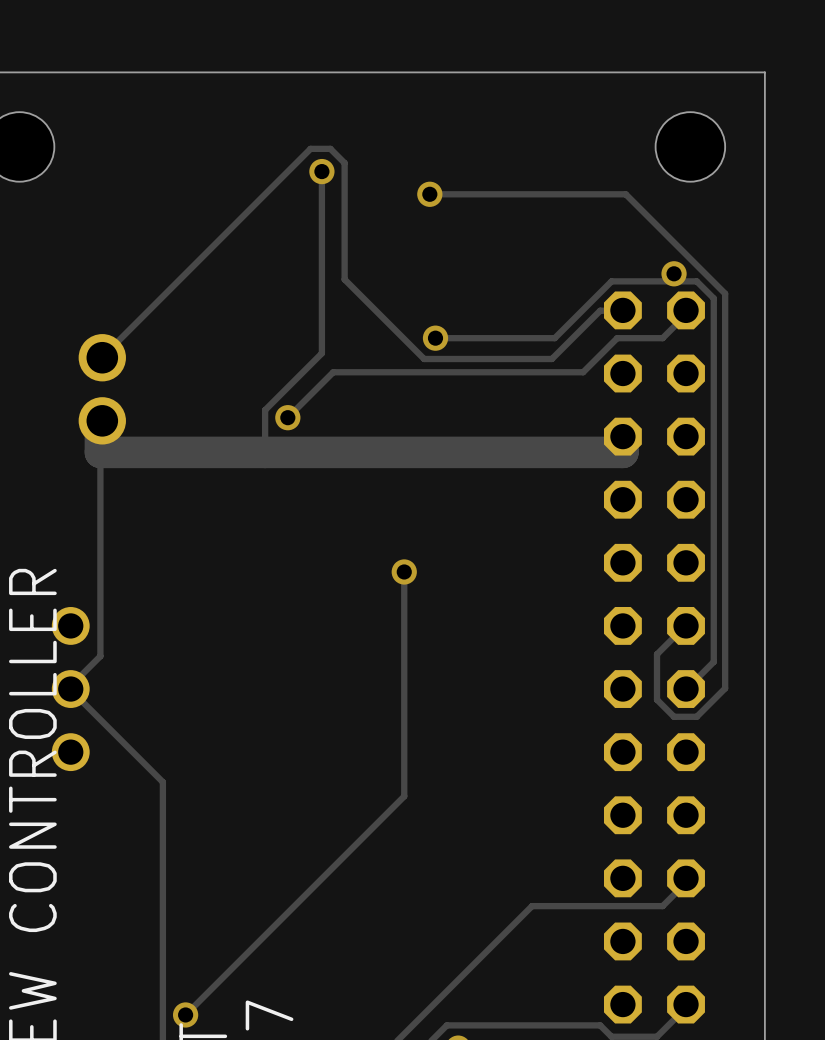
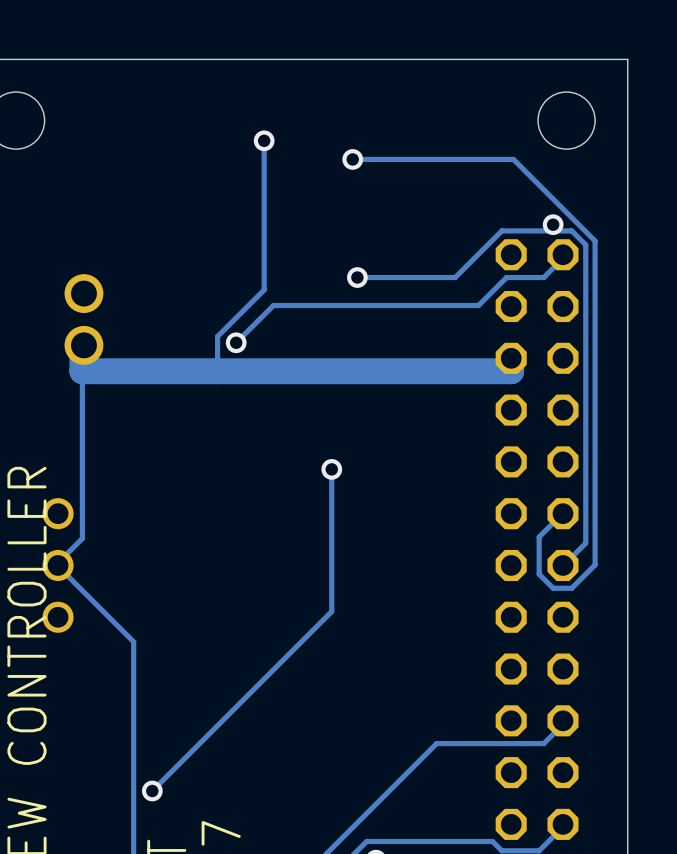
track: (622, 310) (600, 310) (551, 358) (424, 358) (344, 279) (344, 163) (330, 148) (310, 148) (102, 357) -> none
track: (404, 745) (404, 796) (185, 1014) -> (331, 611) (152, 790)
via position: (185, 1014) -> (152, 790)

